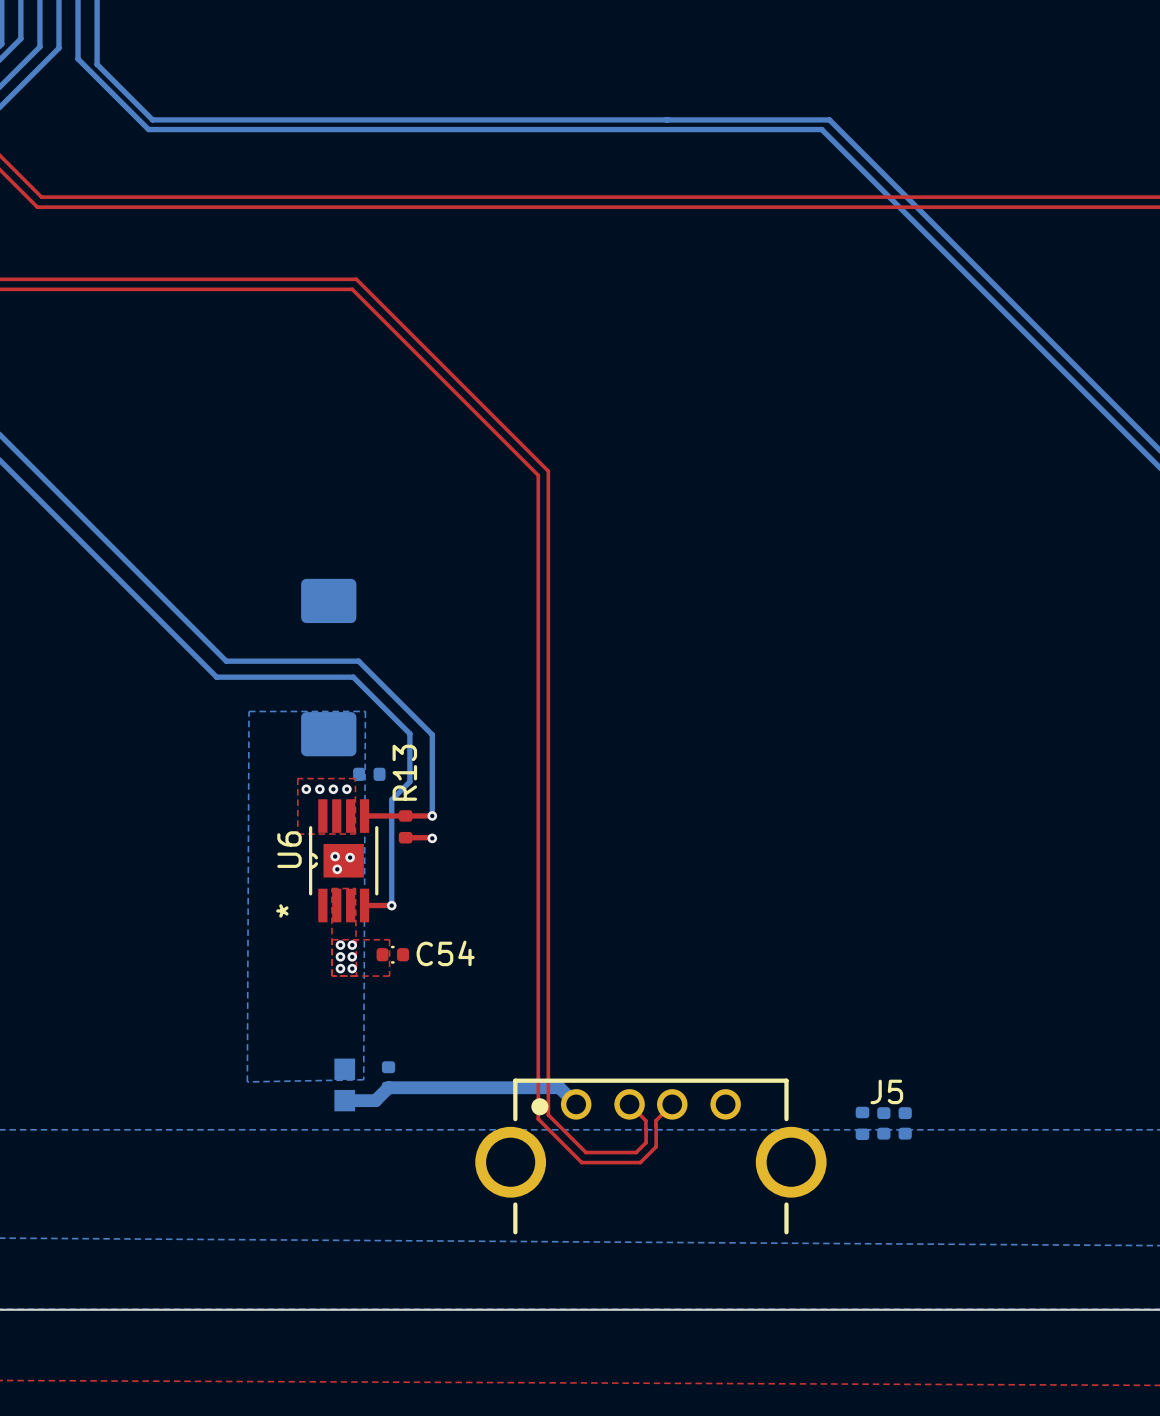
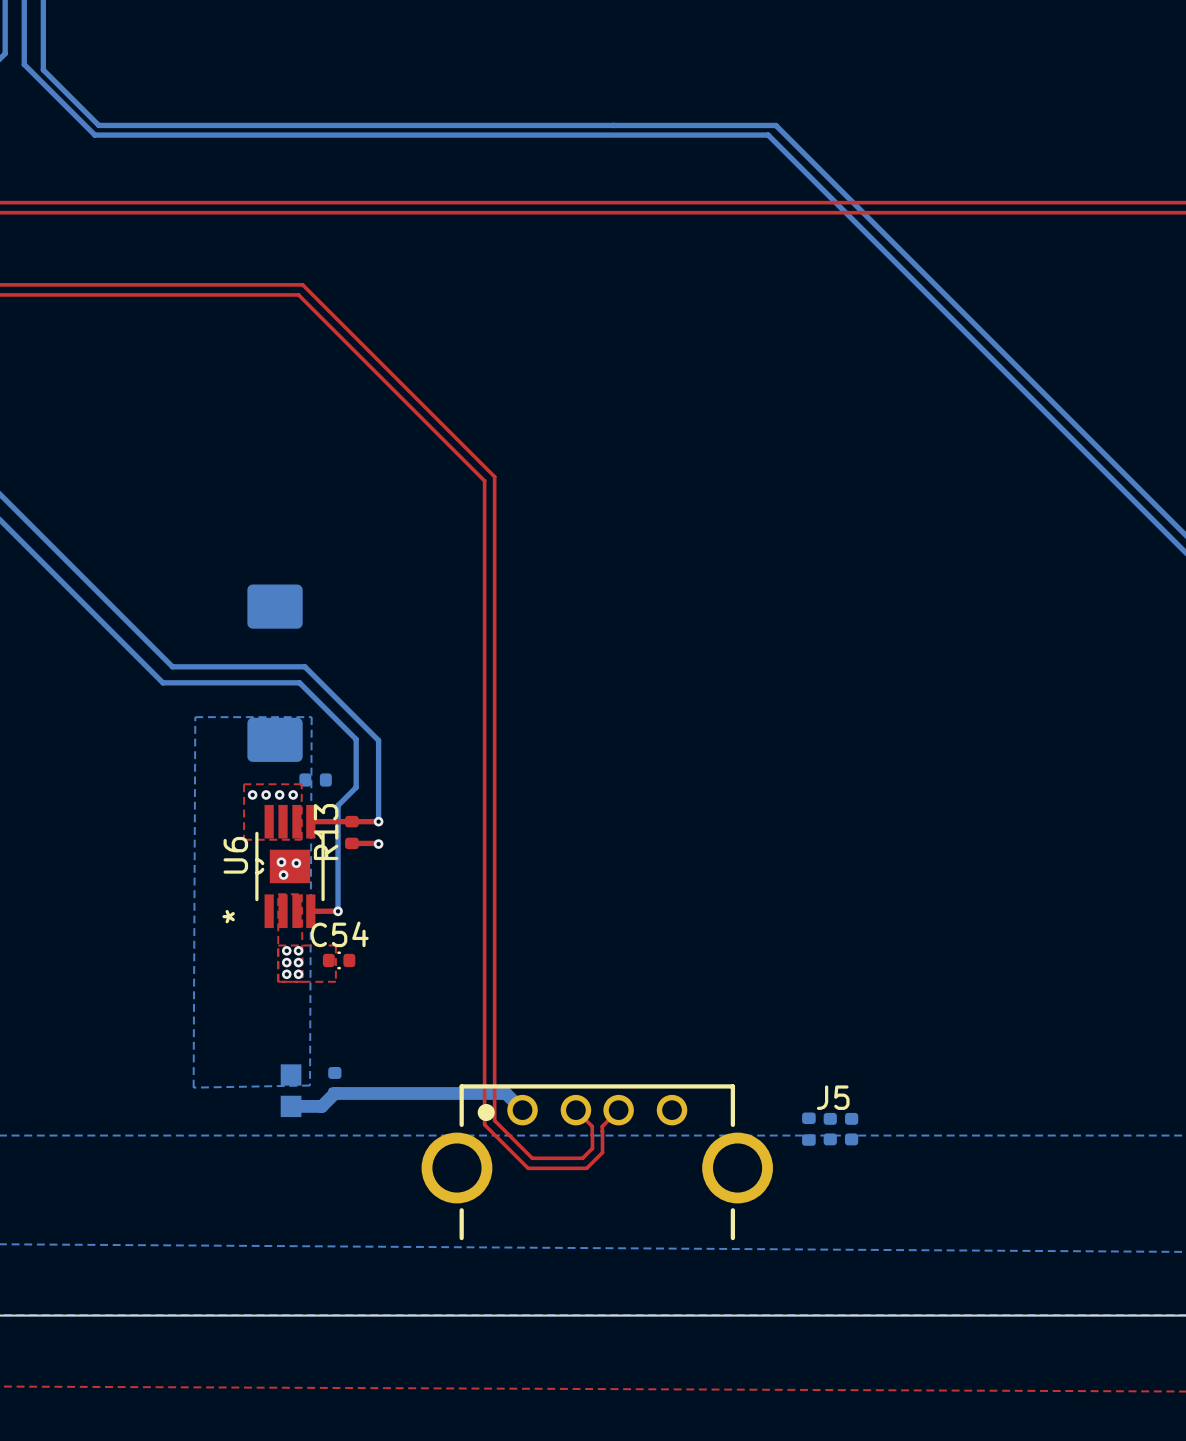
R13 name position: R13 (404, 772) -> R13 (326, 832)
C54 name position: C54 (445, 953) -> C54 (339, 934)

